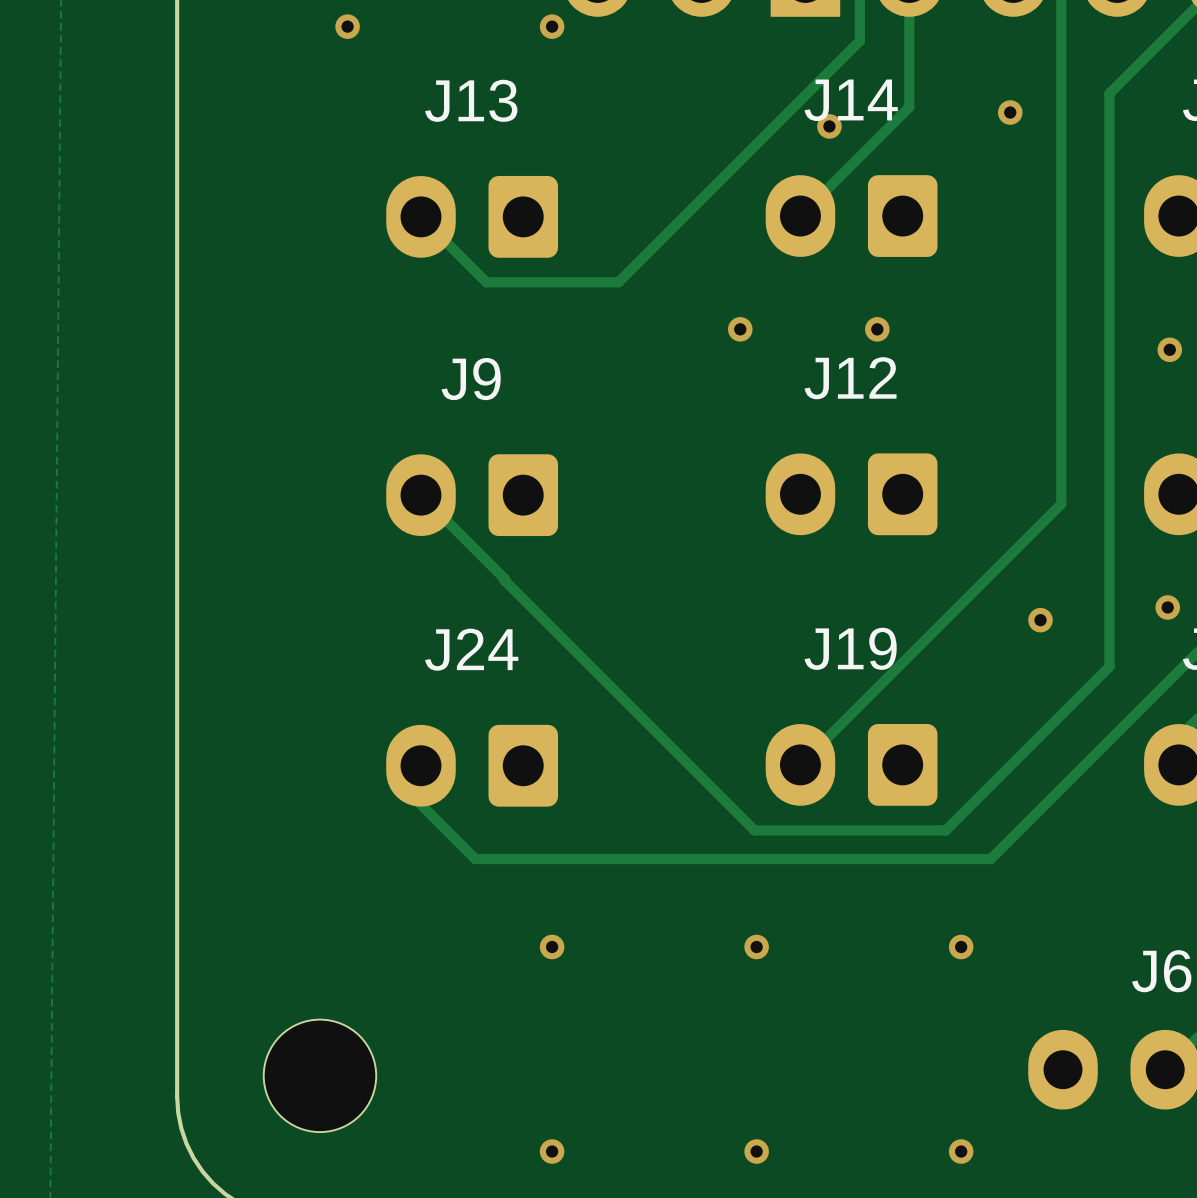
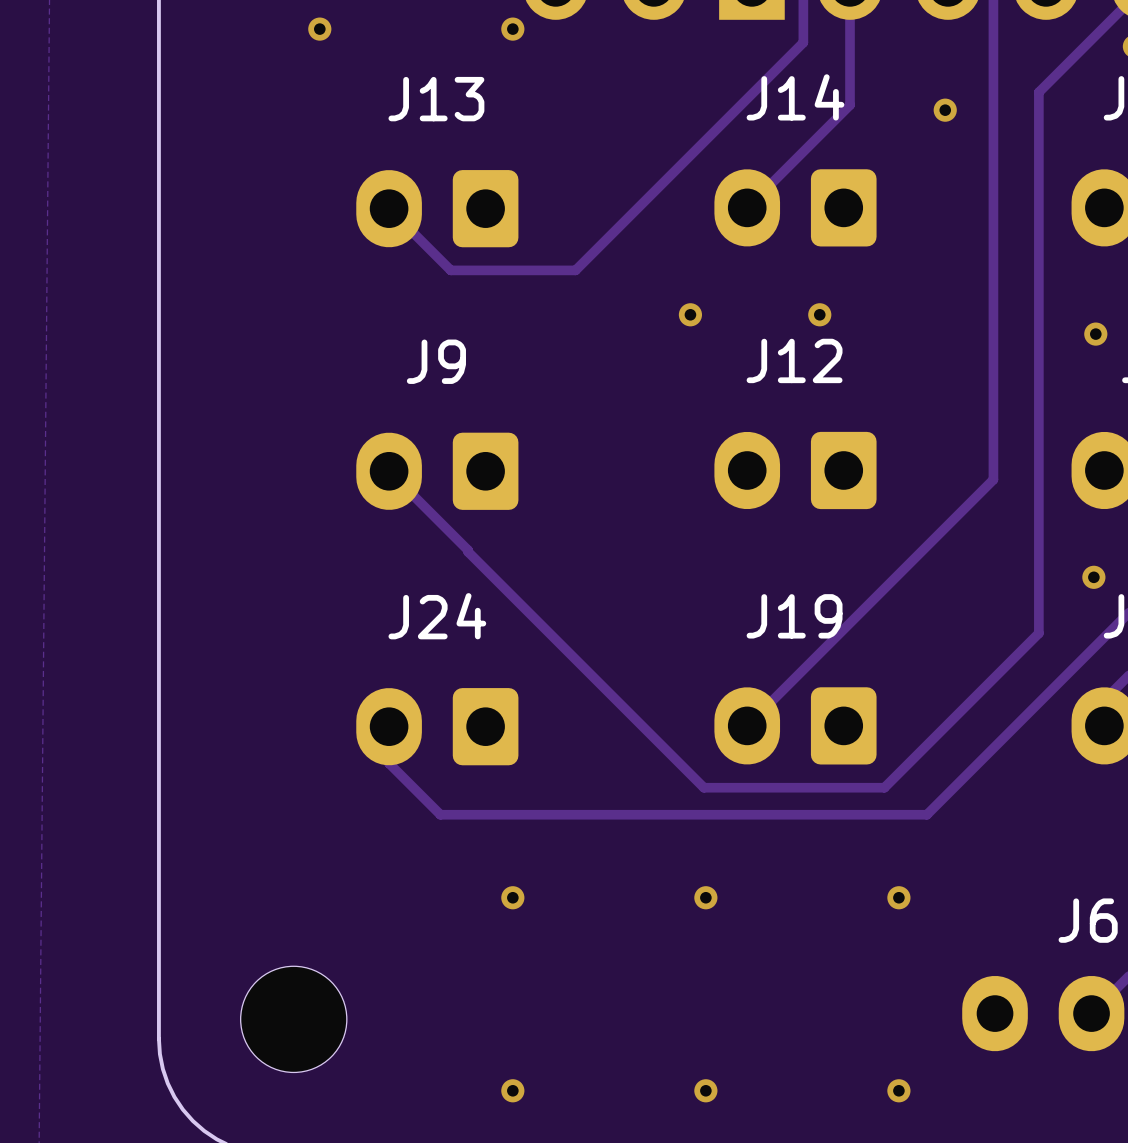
via: (829, 126) -> none
via: (1040, 620) -> none

